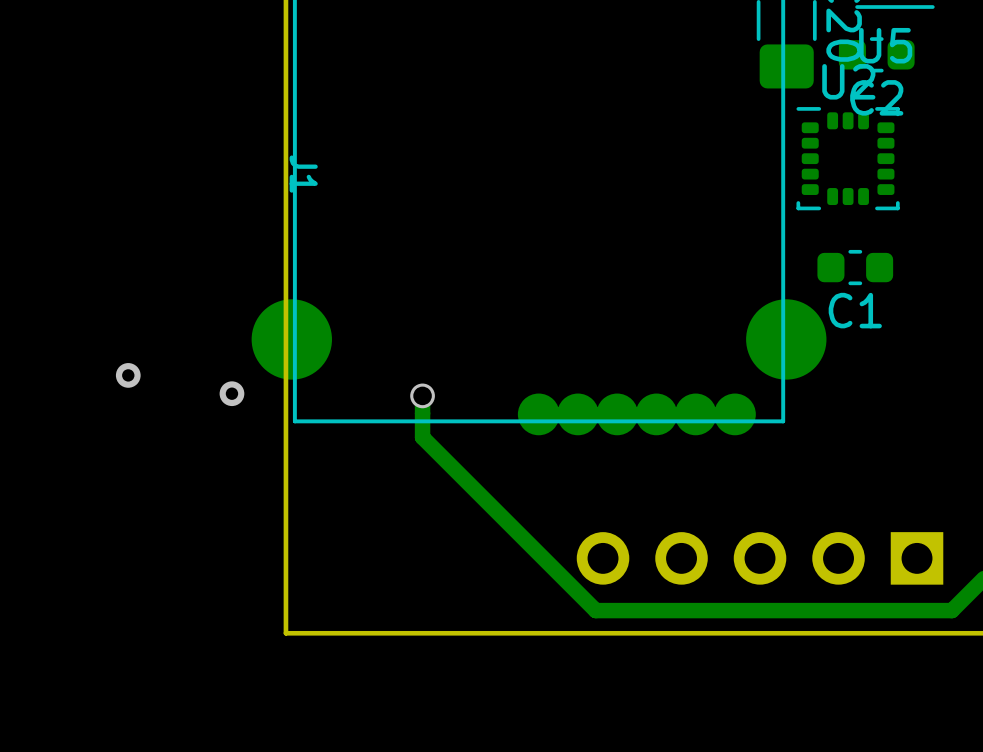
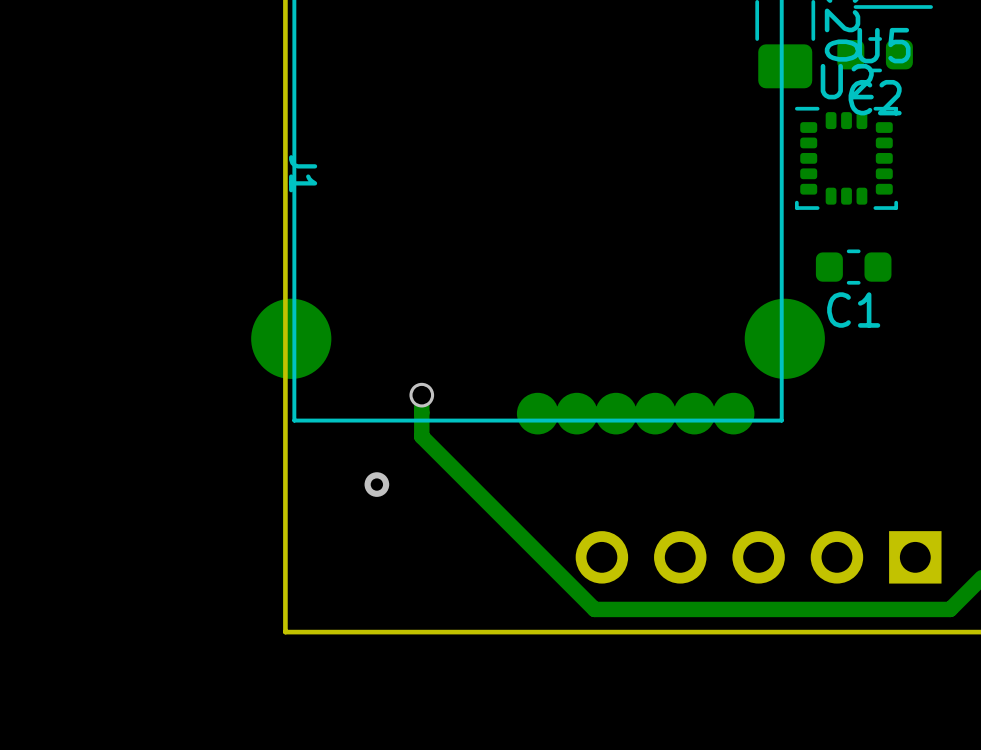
via: (128, 375) -> none
via: (231, 393) -> none
via: none -> (376, 484)

